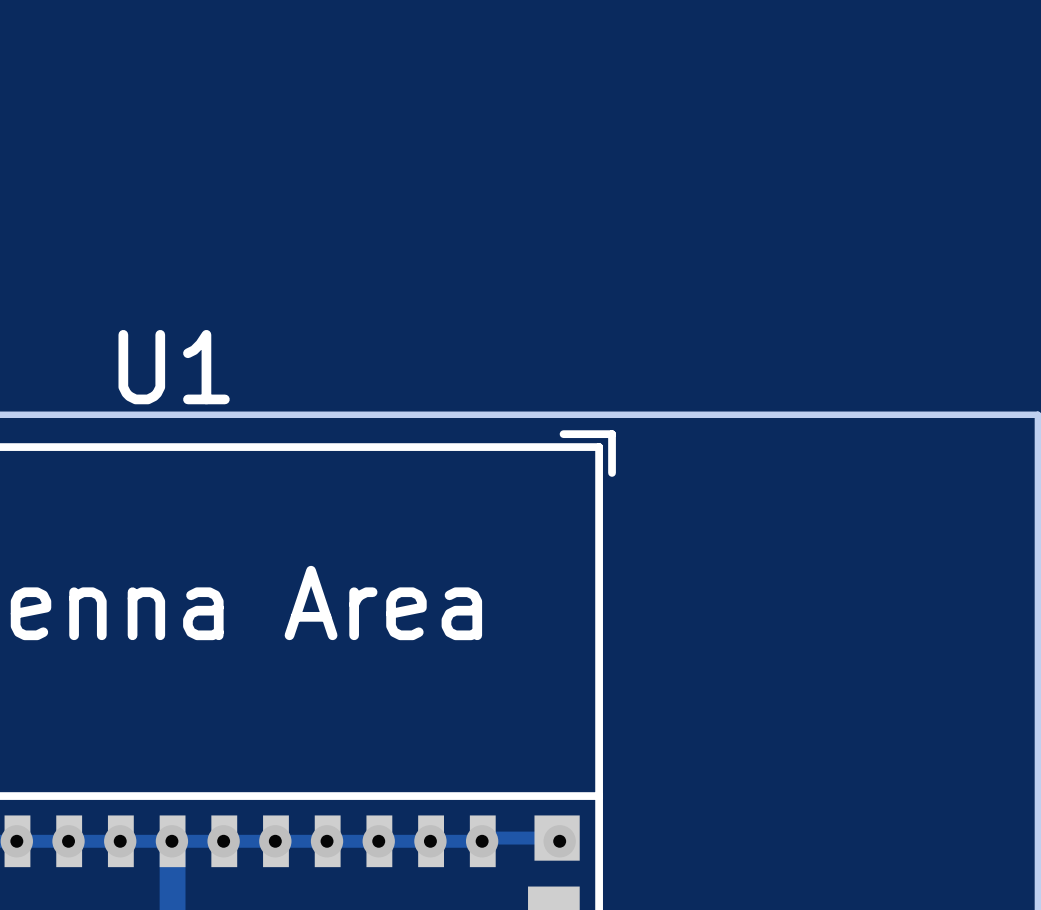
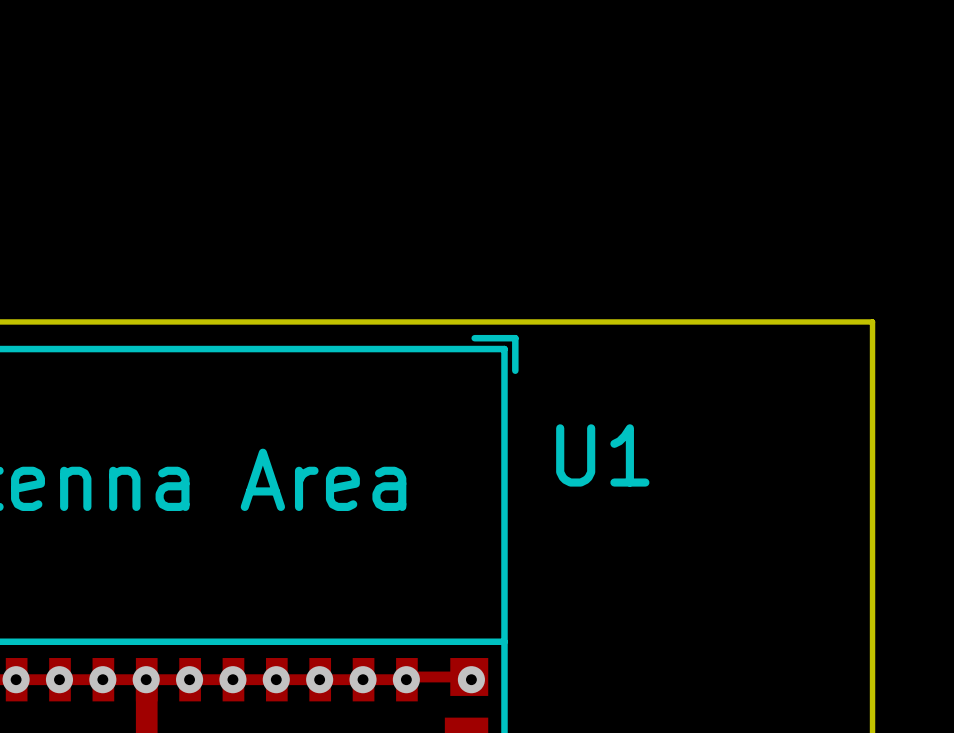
U1 name position: U1 (174, 367) -> U1 (602, 455)

